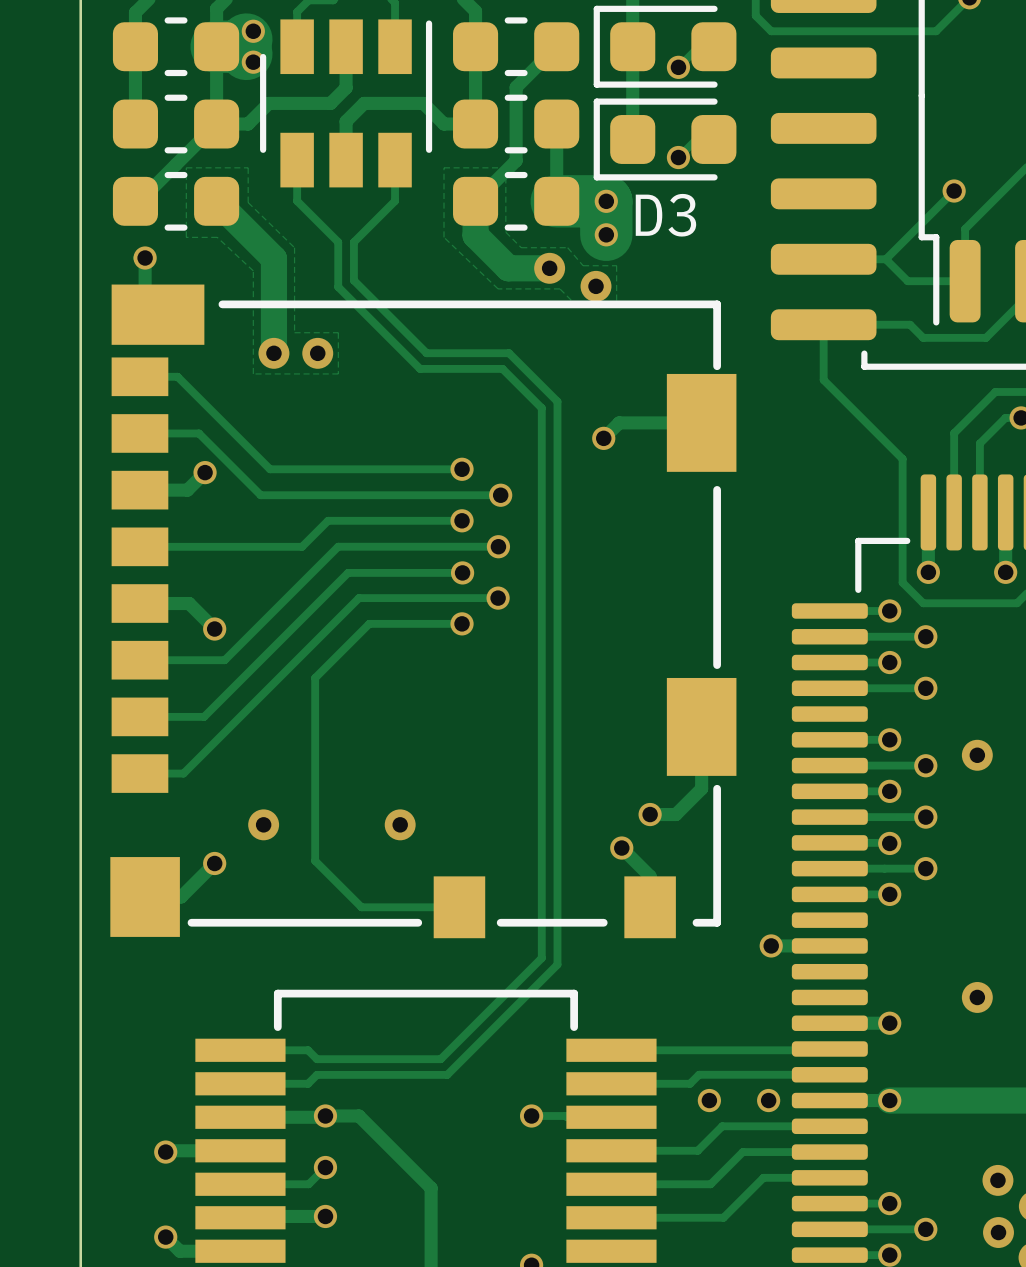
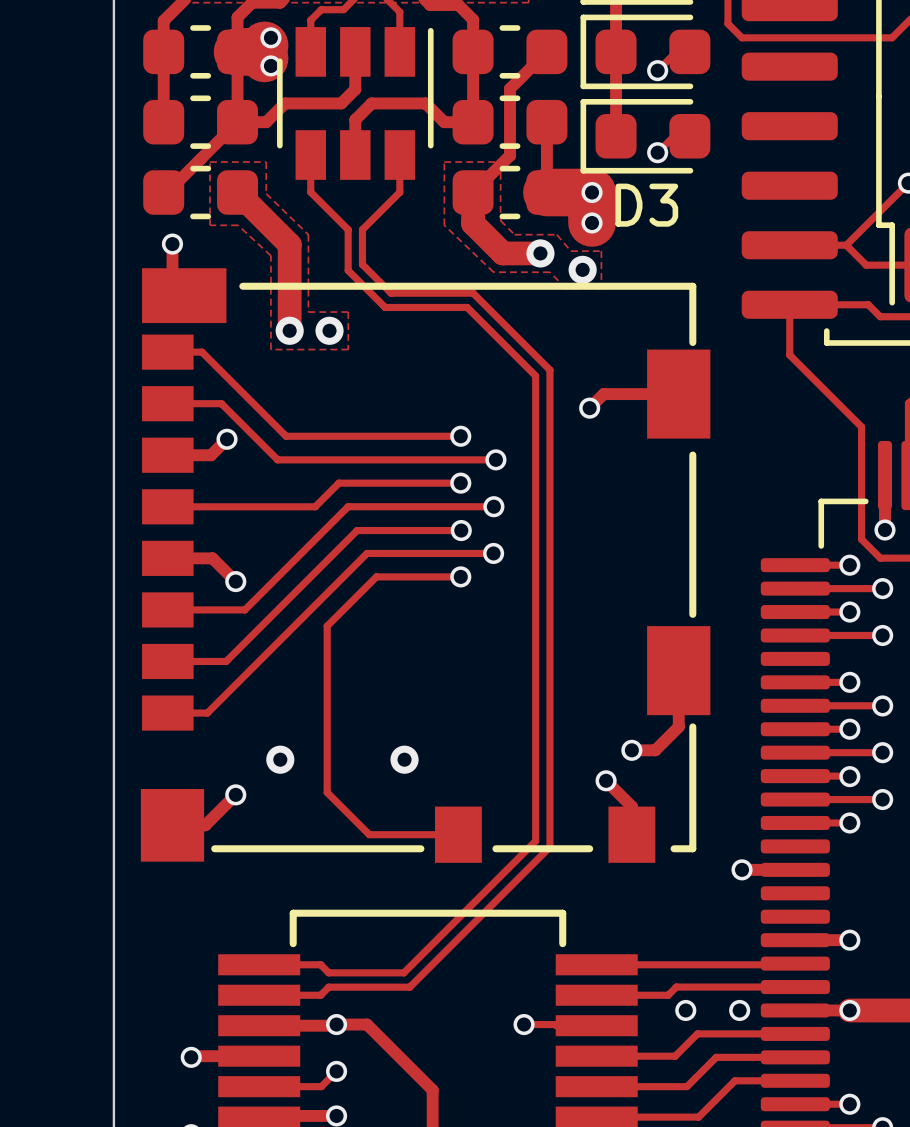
track: (385, 311) (426, 353) (509, 353) (557, 401) (557, 964) (447, 1074) (406, 1074) -> (391, 293) (473, 293) (549, 370) (549, 847) (409, 987)
track: (378, 327) (420, 368) (502, 368) (541, 408) (541, 958) (440, 1059) (399, 1059) -> (385, 307) (467, 307) (535, 375) (535, 841) (403, 972)

